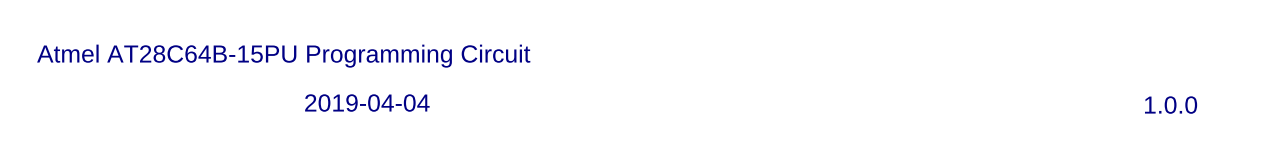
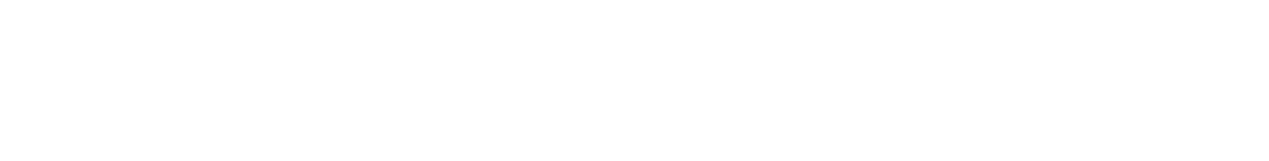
text: Atmel AT28C64B-15PU Programming Circuit (283, 56) -> none
text: 2019-04-04 (367, 103) -> none
text: 1.0.0 (1171, 105) -> none

